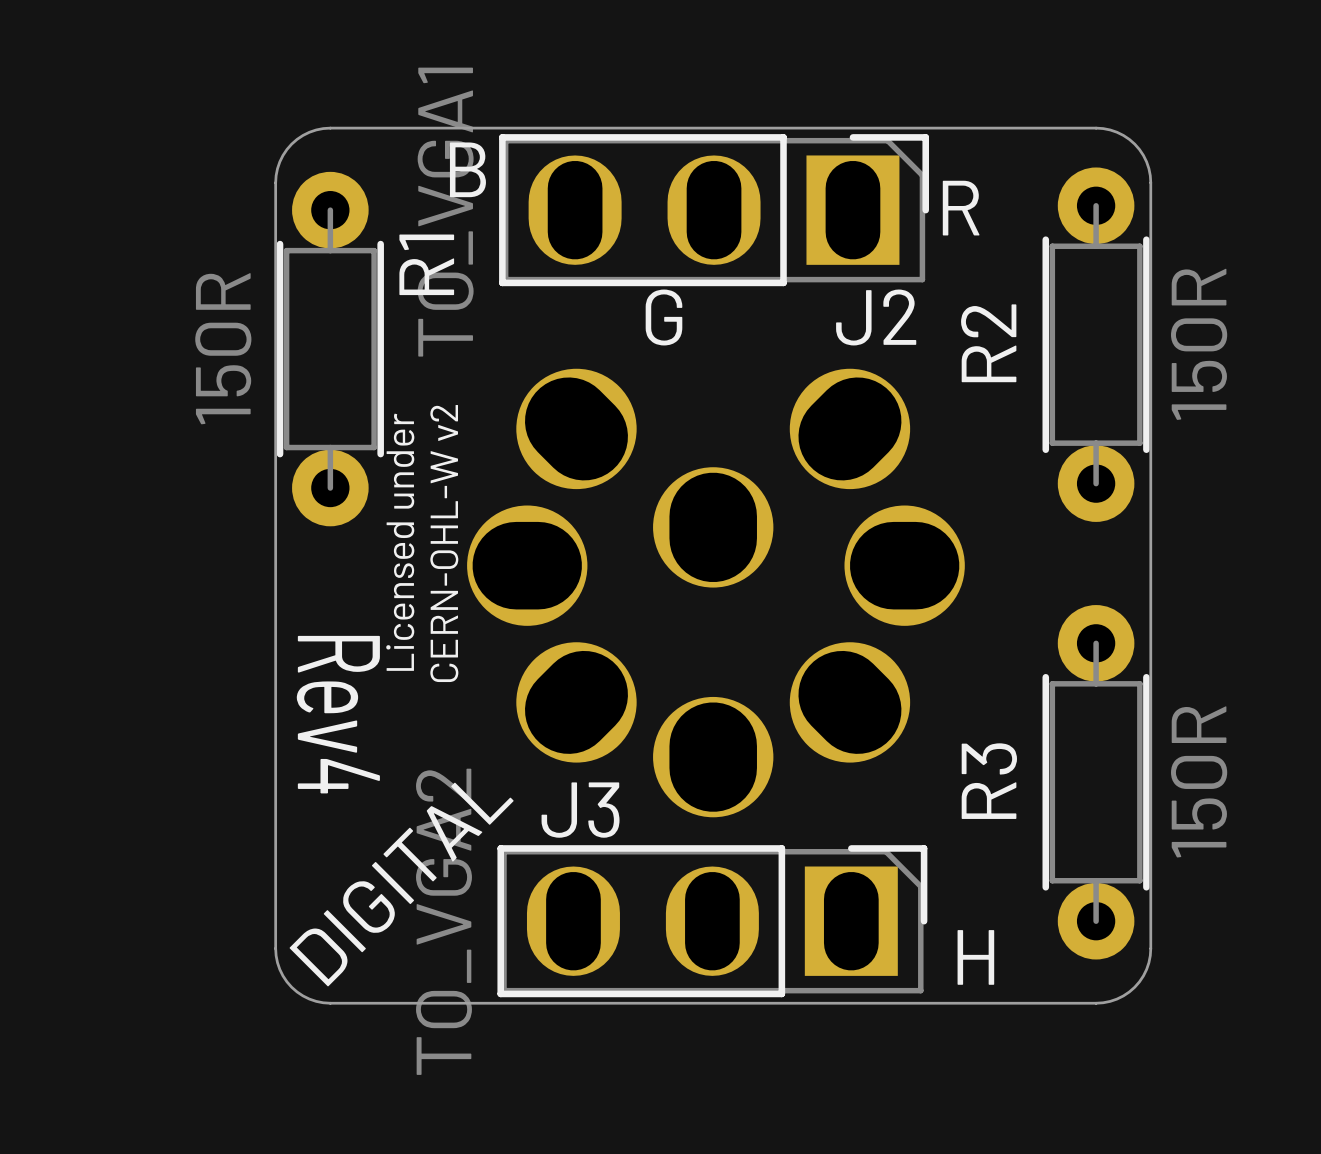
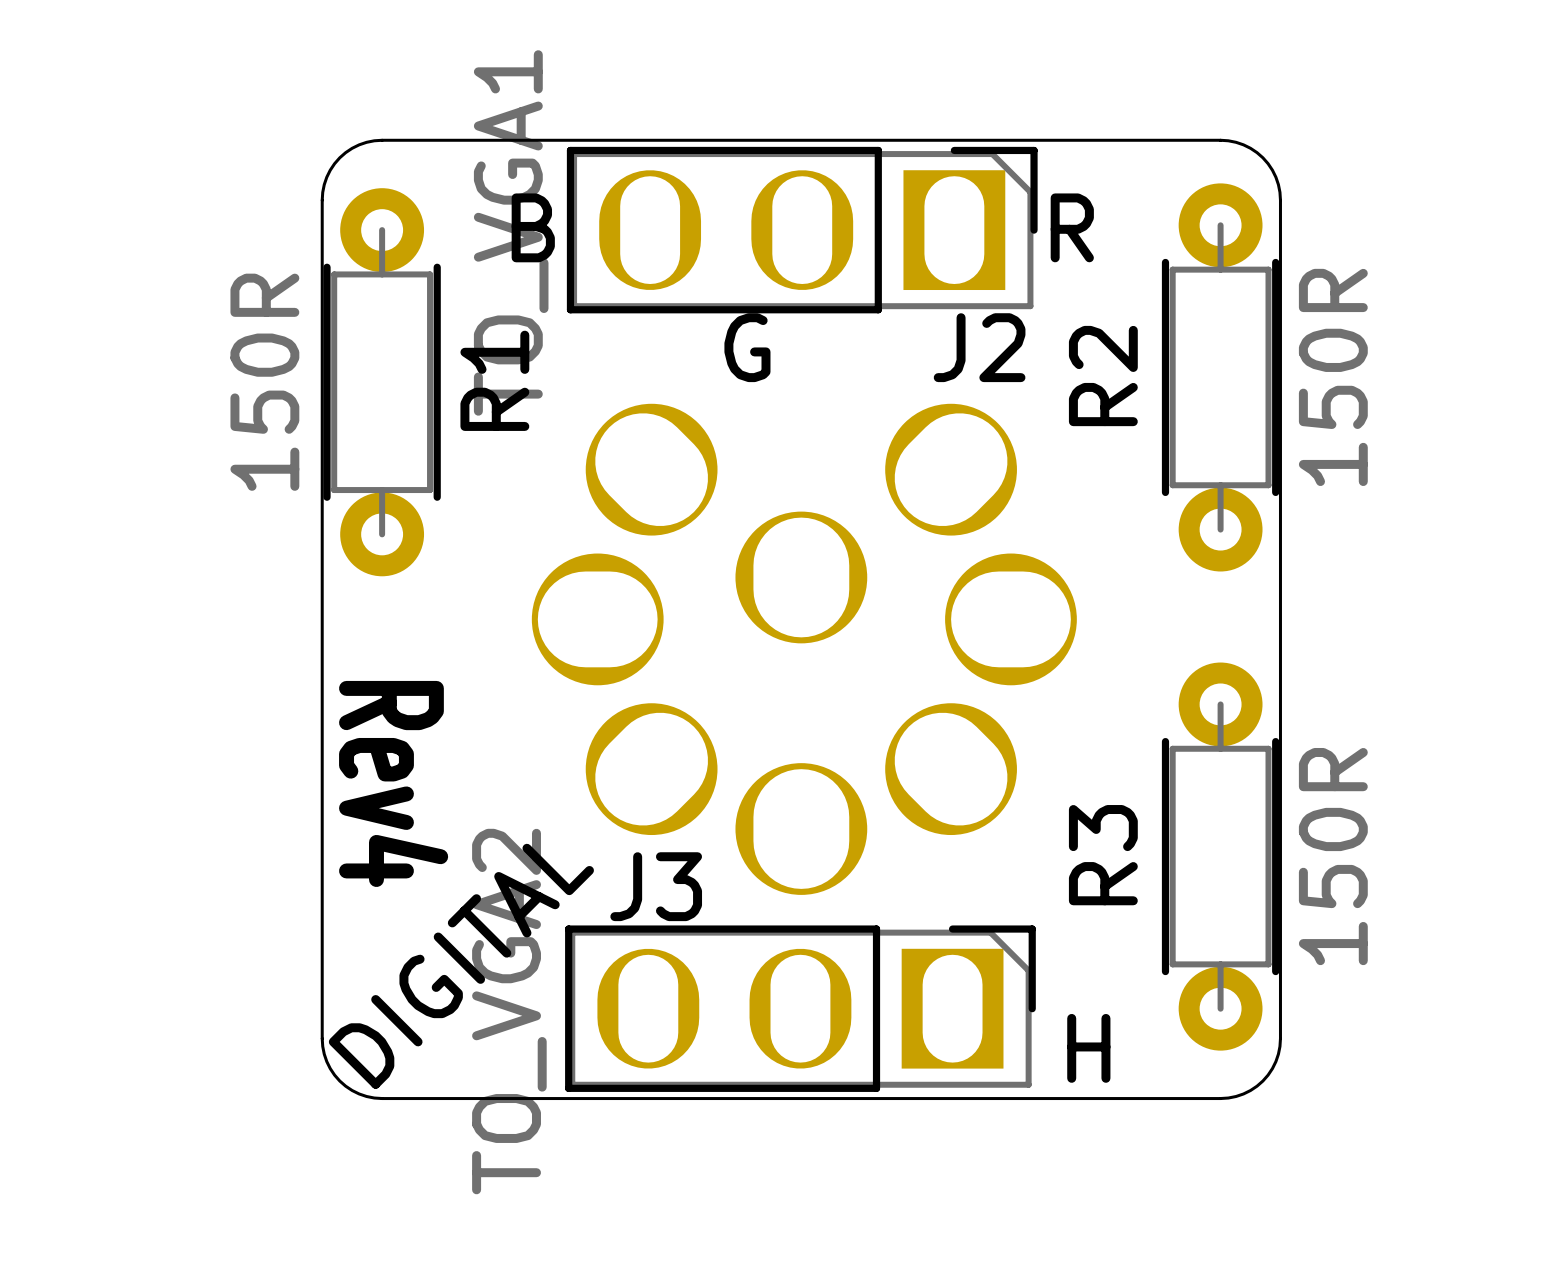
text position: B (467, 169) -> B (533, 227)
R1 name position: R1 (426, 264) -> R1 (494, 380)
text: Licensed under (400, 542) -> none
text: CERN-OHL-W v2 (444, 543) -> none

